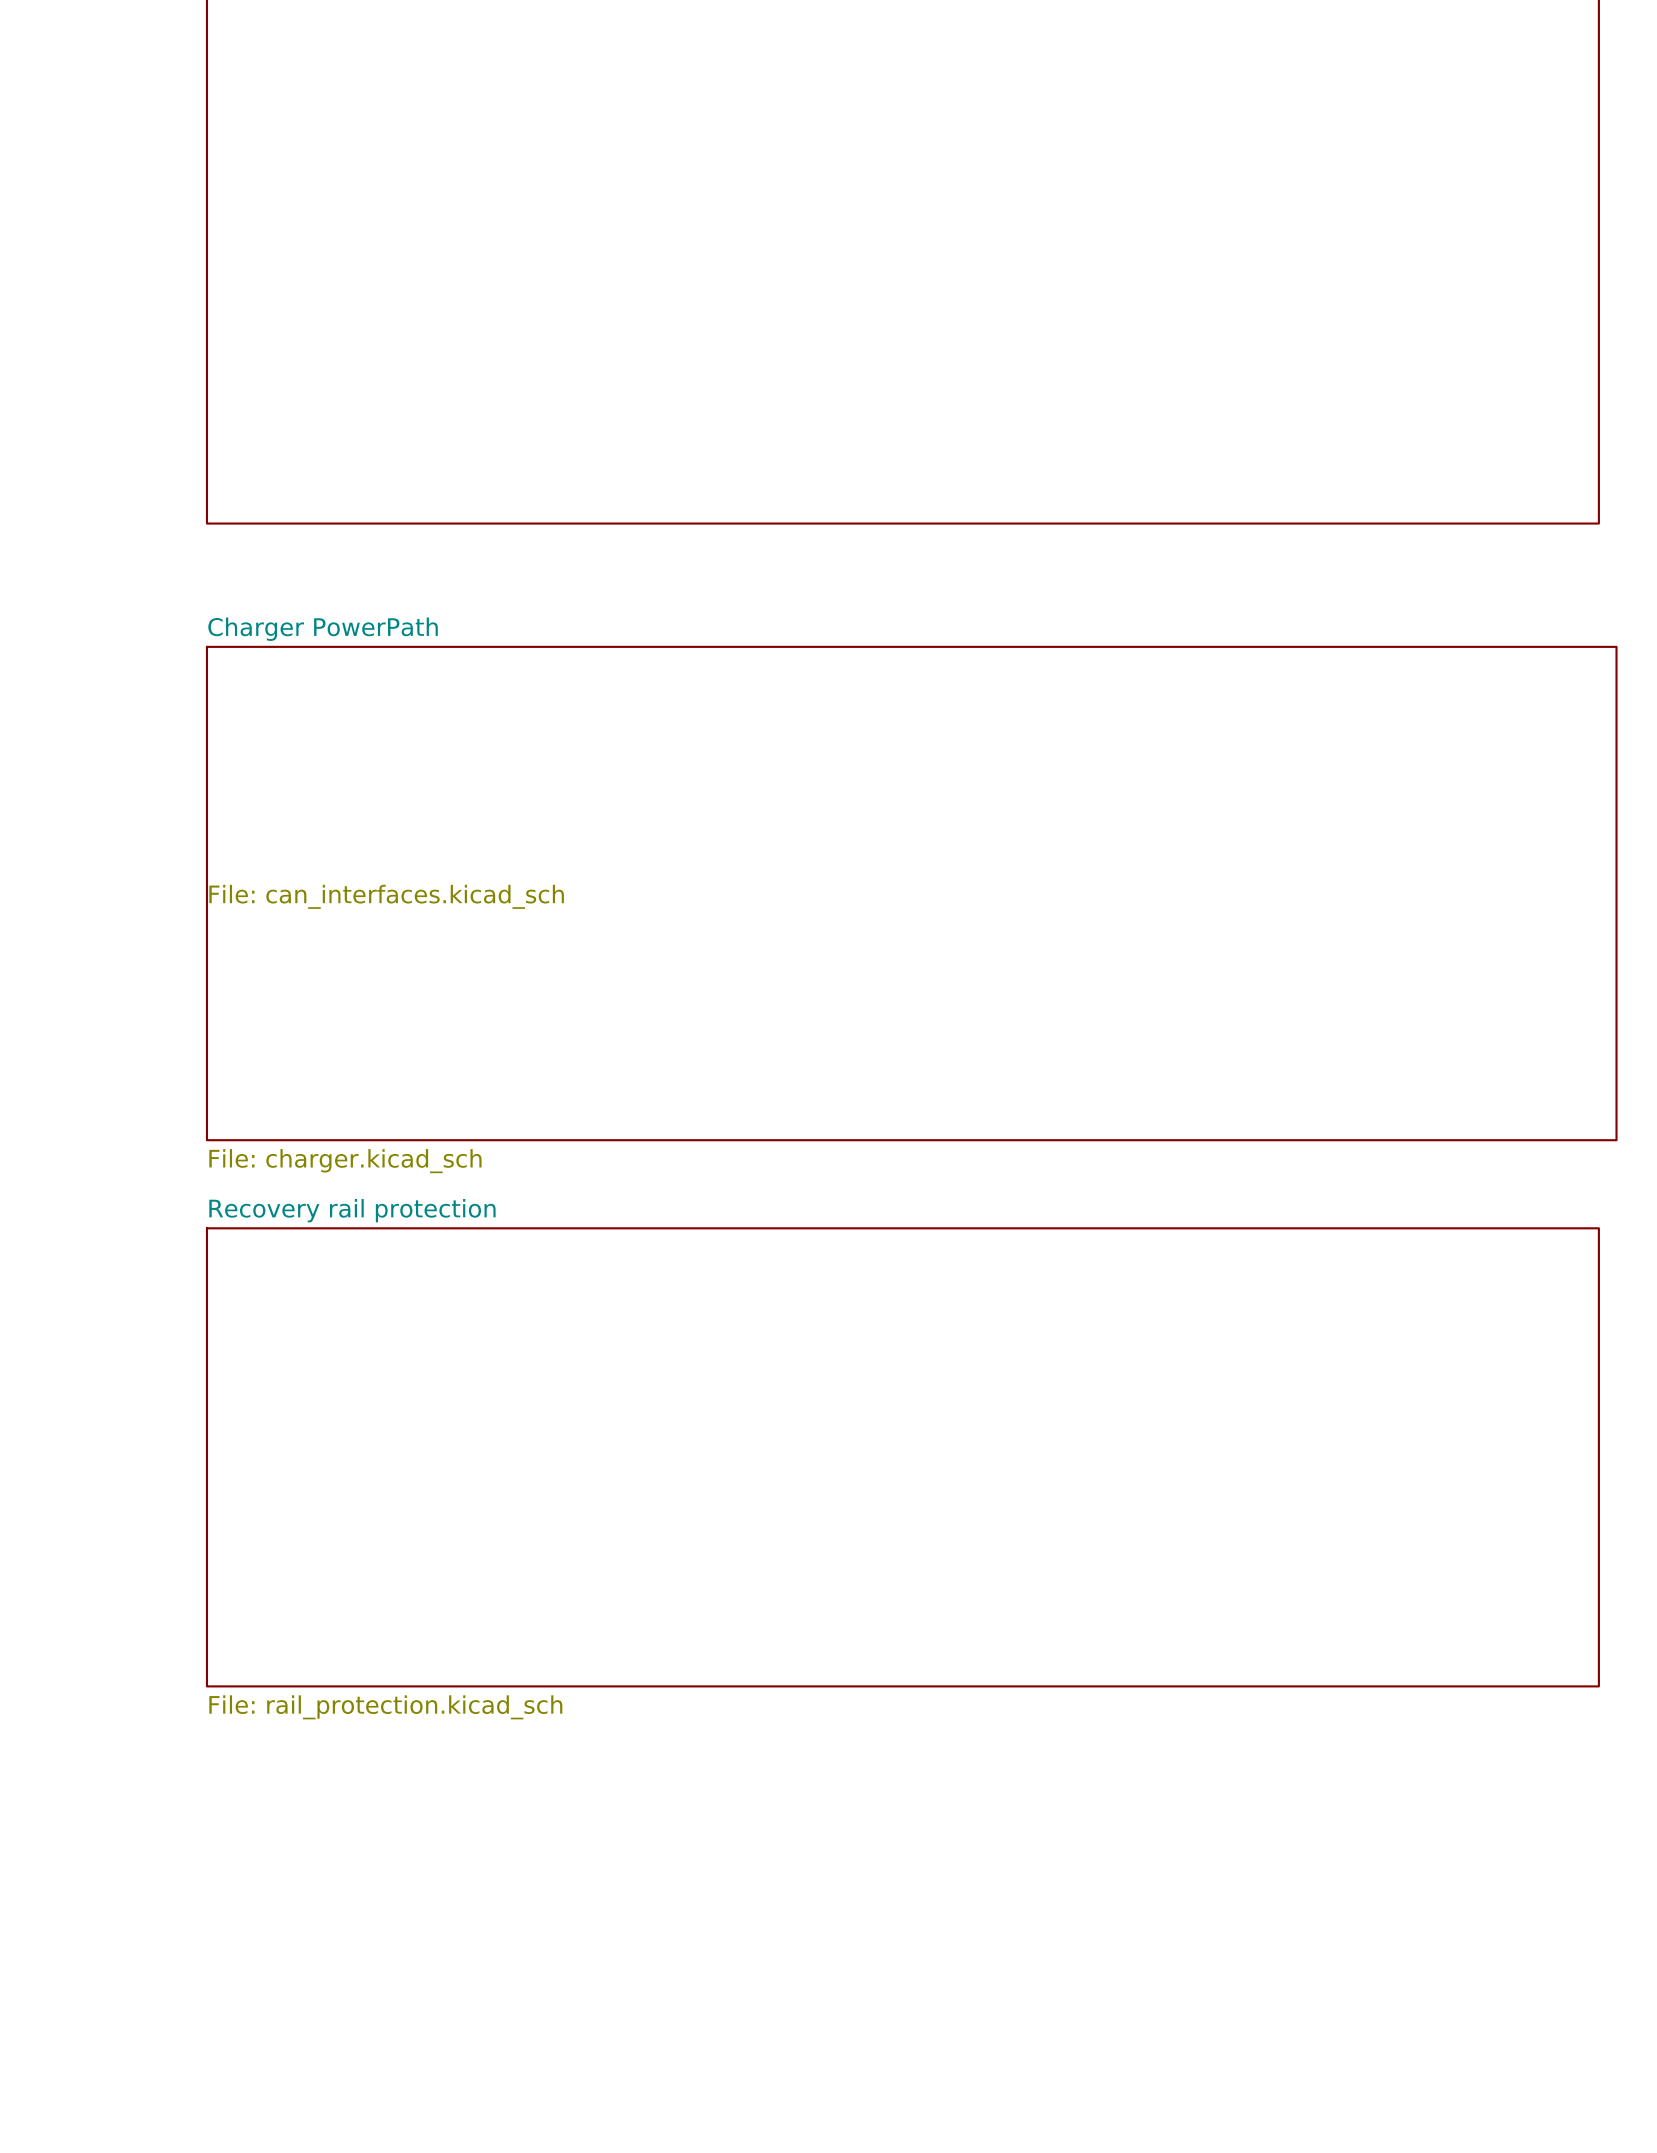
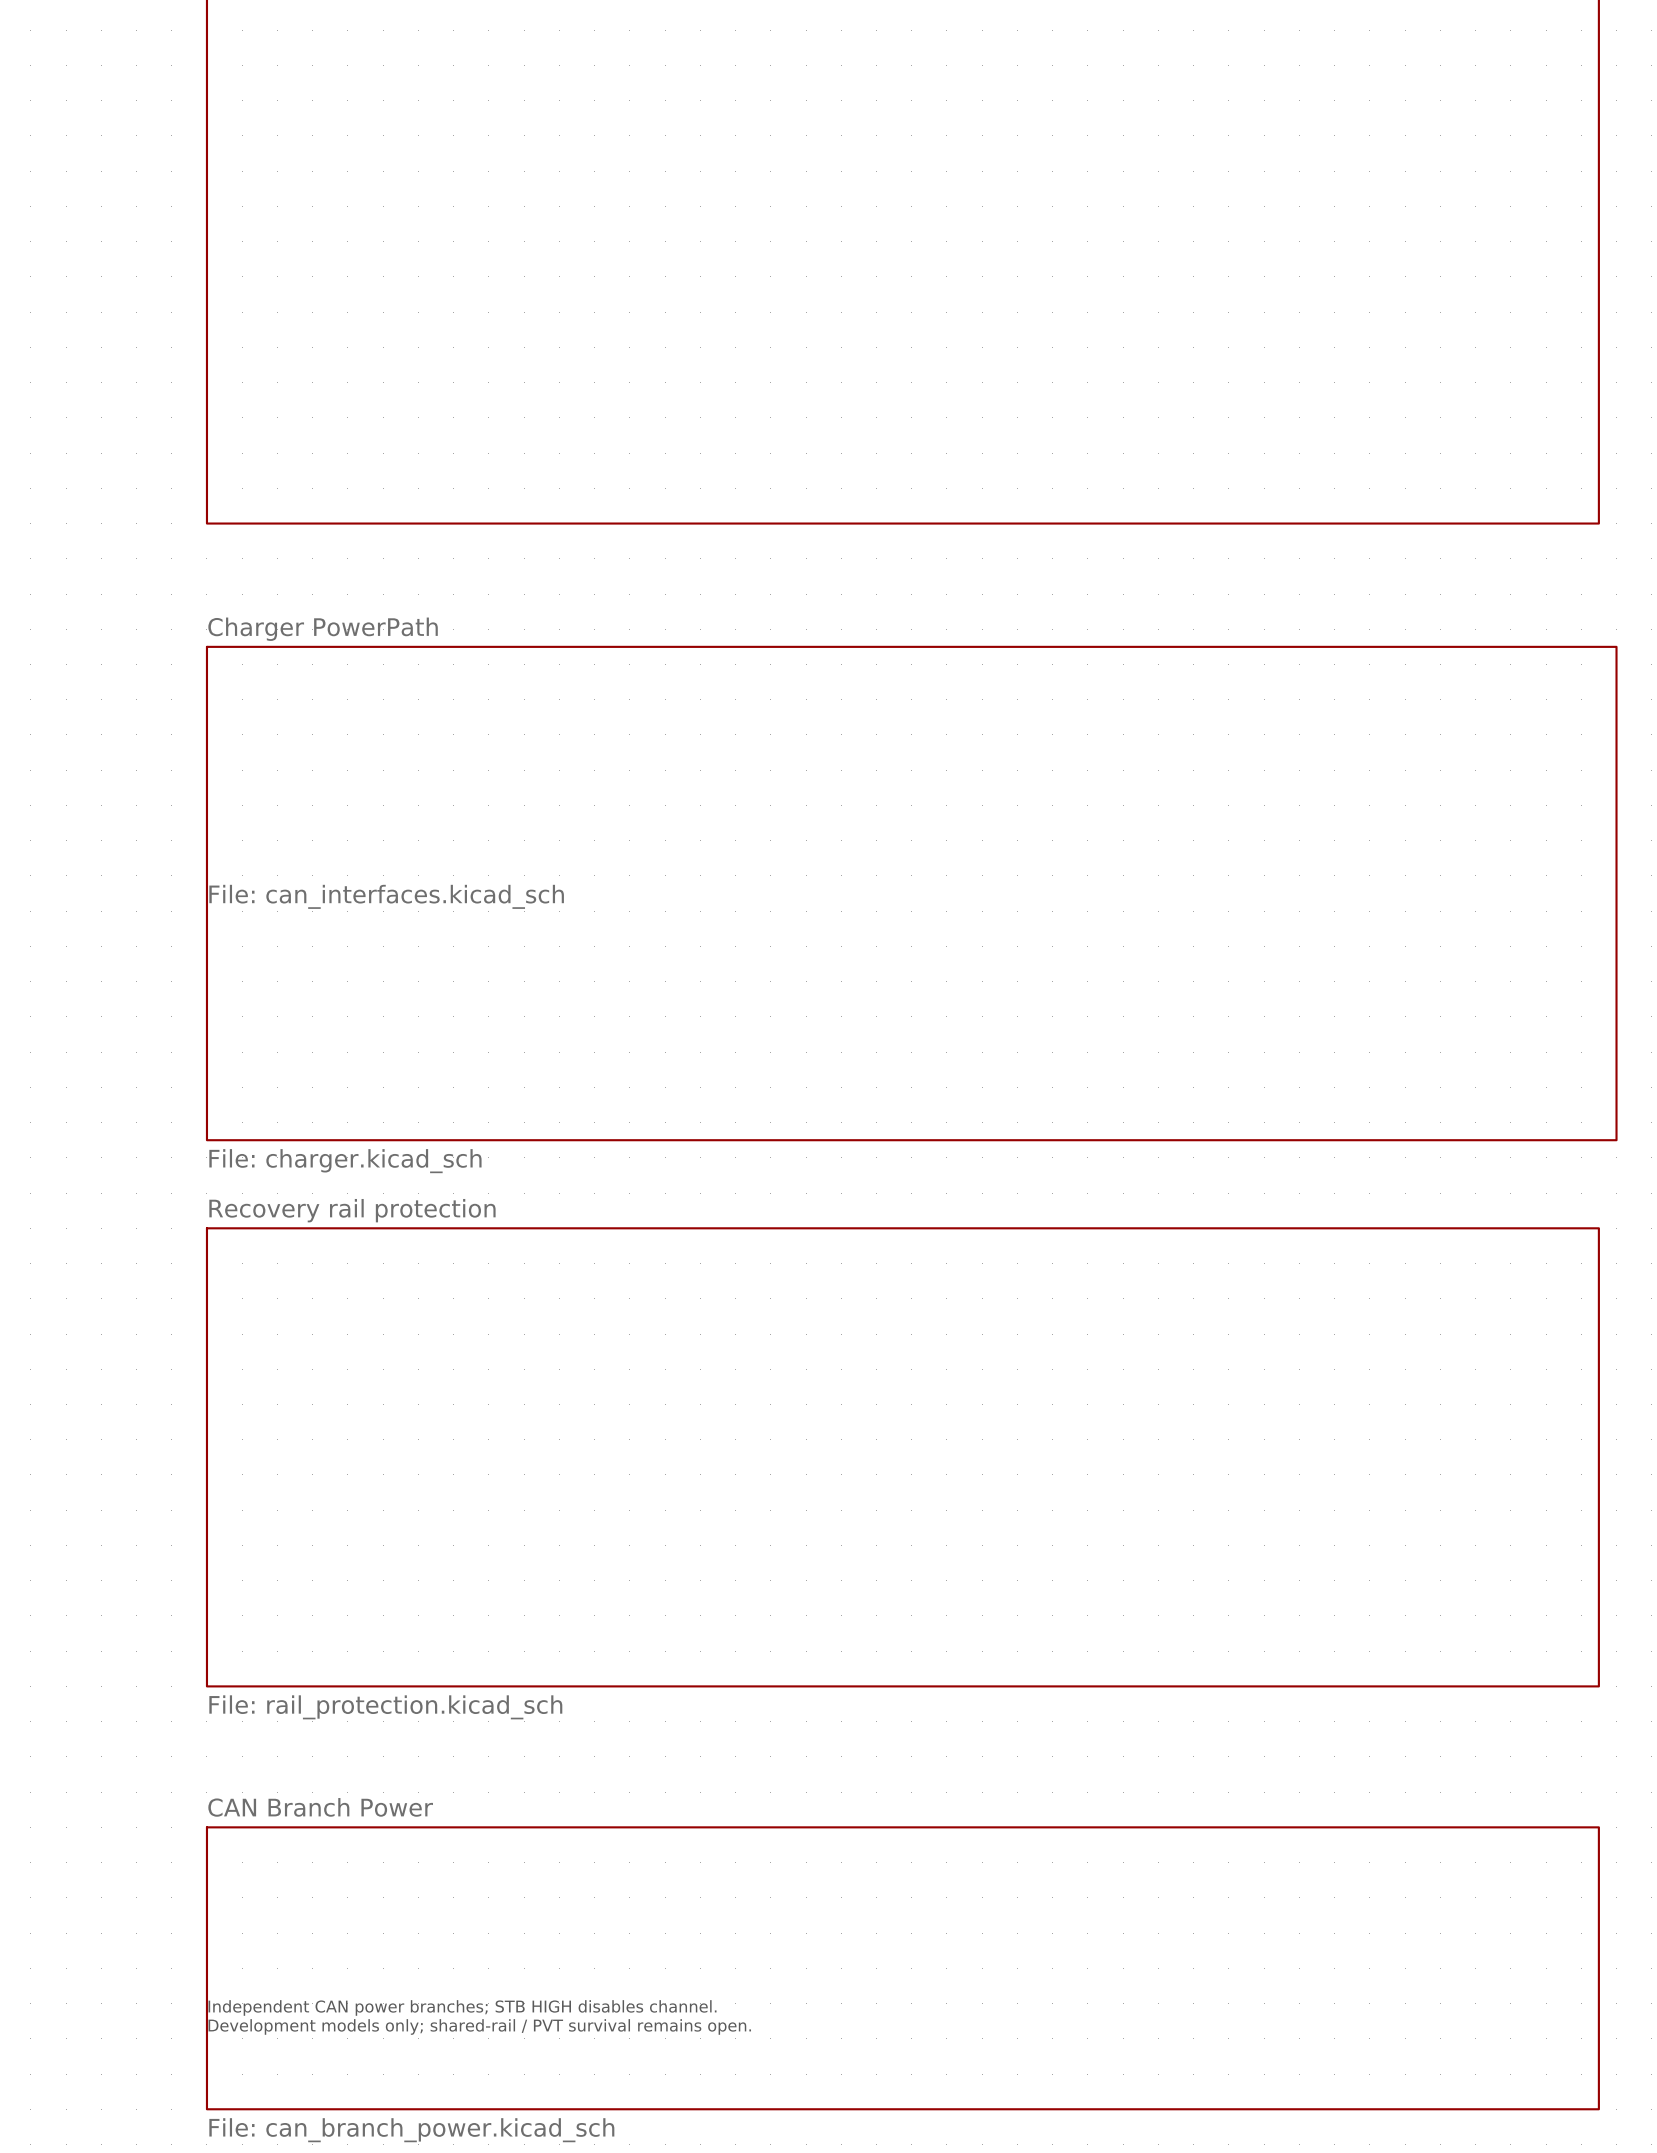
sheet CAN Branch Power: none -> File: can_branch_power.kicad_sch (902, 1968)
text: none -> Independent CAN power branches; STB HIGH disables channel. (462, 2007)
text: none -> Development models only; shared-rail / PVT survival remains open. (479, 2026)

